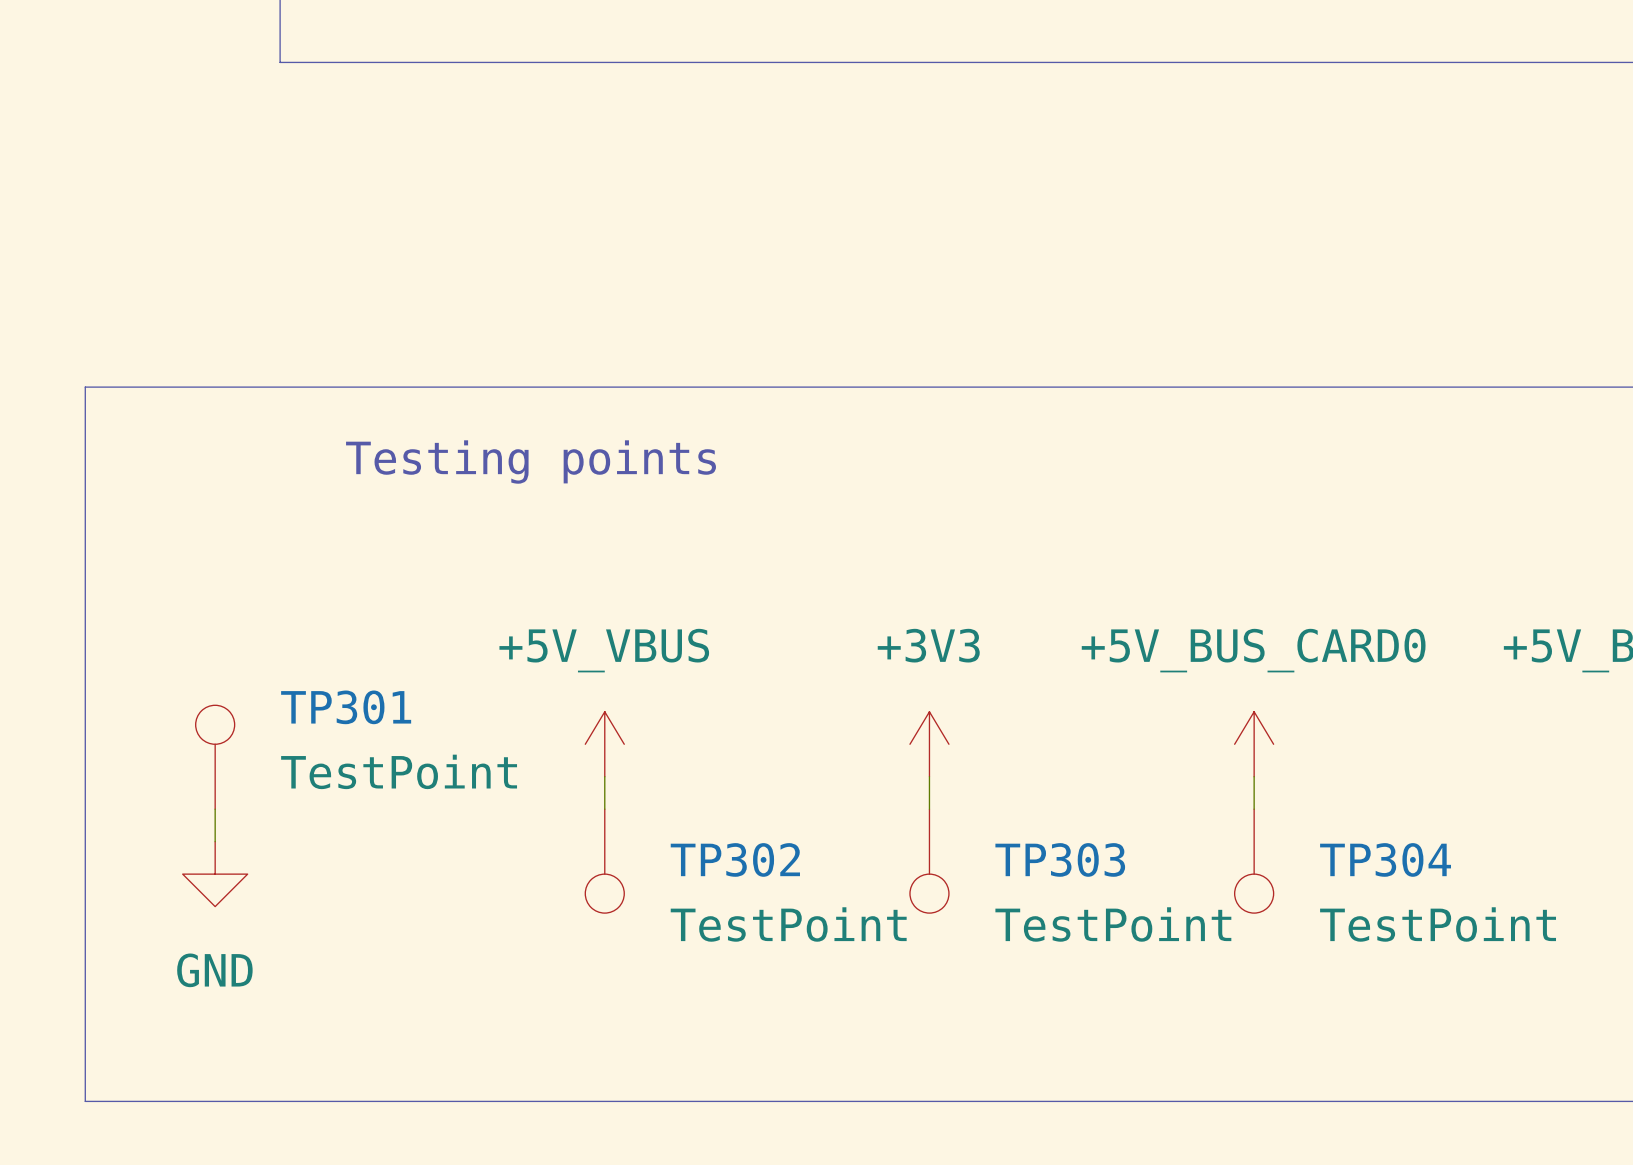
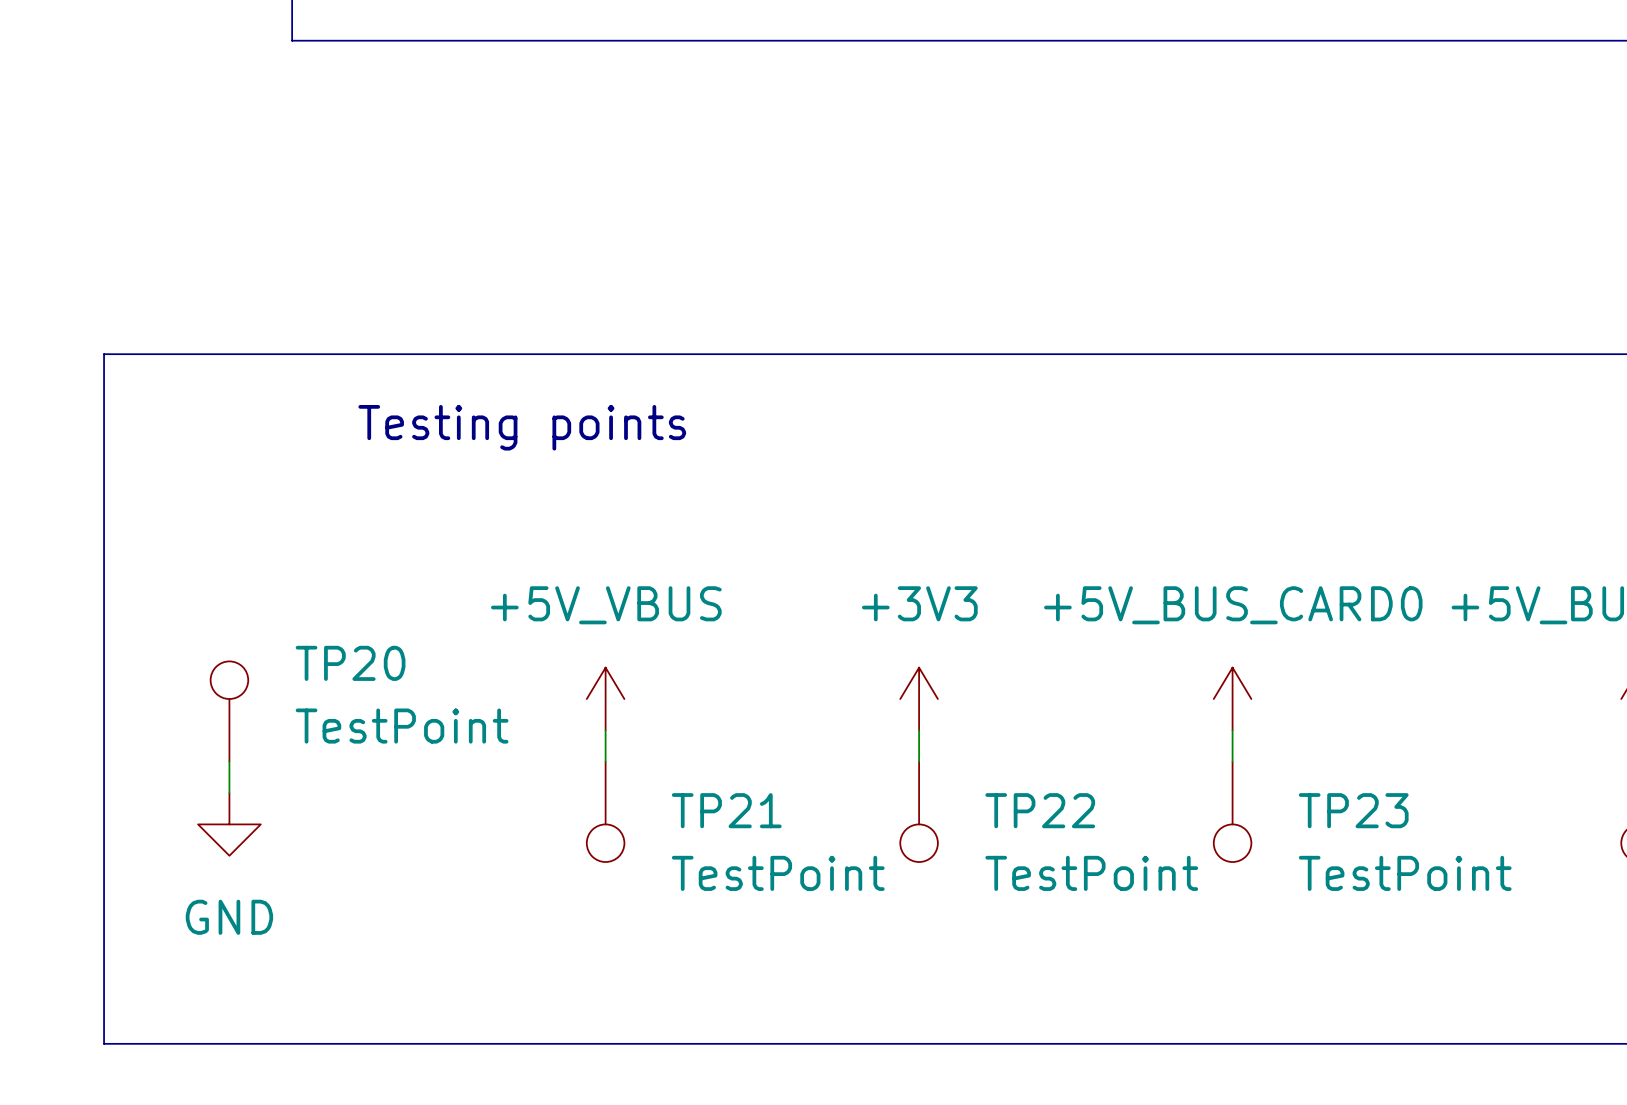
TP301 name: TP301 (346, 707) -> TP20 (350, 663)
TP302 name: TP302 (735, 859) -> TP21 (726, 810)
TP303 name: TP303 (1060, 859) -> TP22 (1040, 810)
TP304 name: TP304 (1385, 859) -> TP23 (1353, 810)

